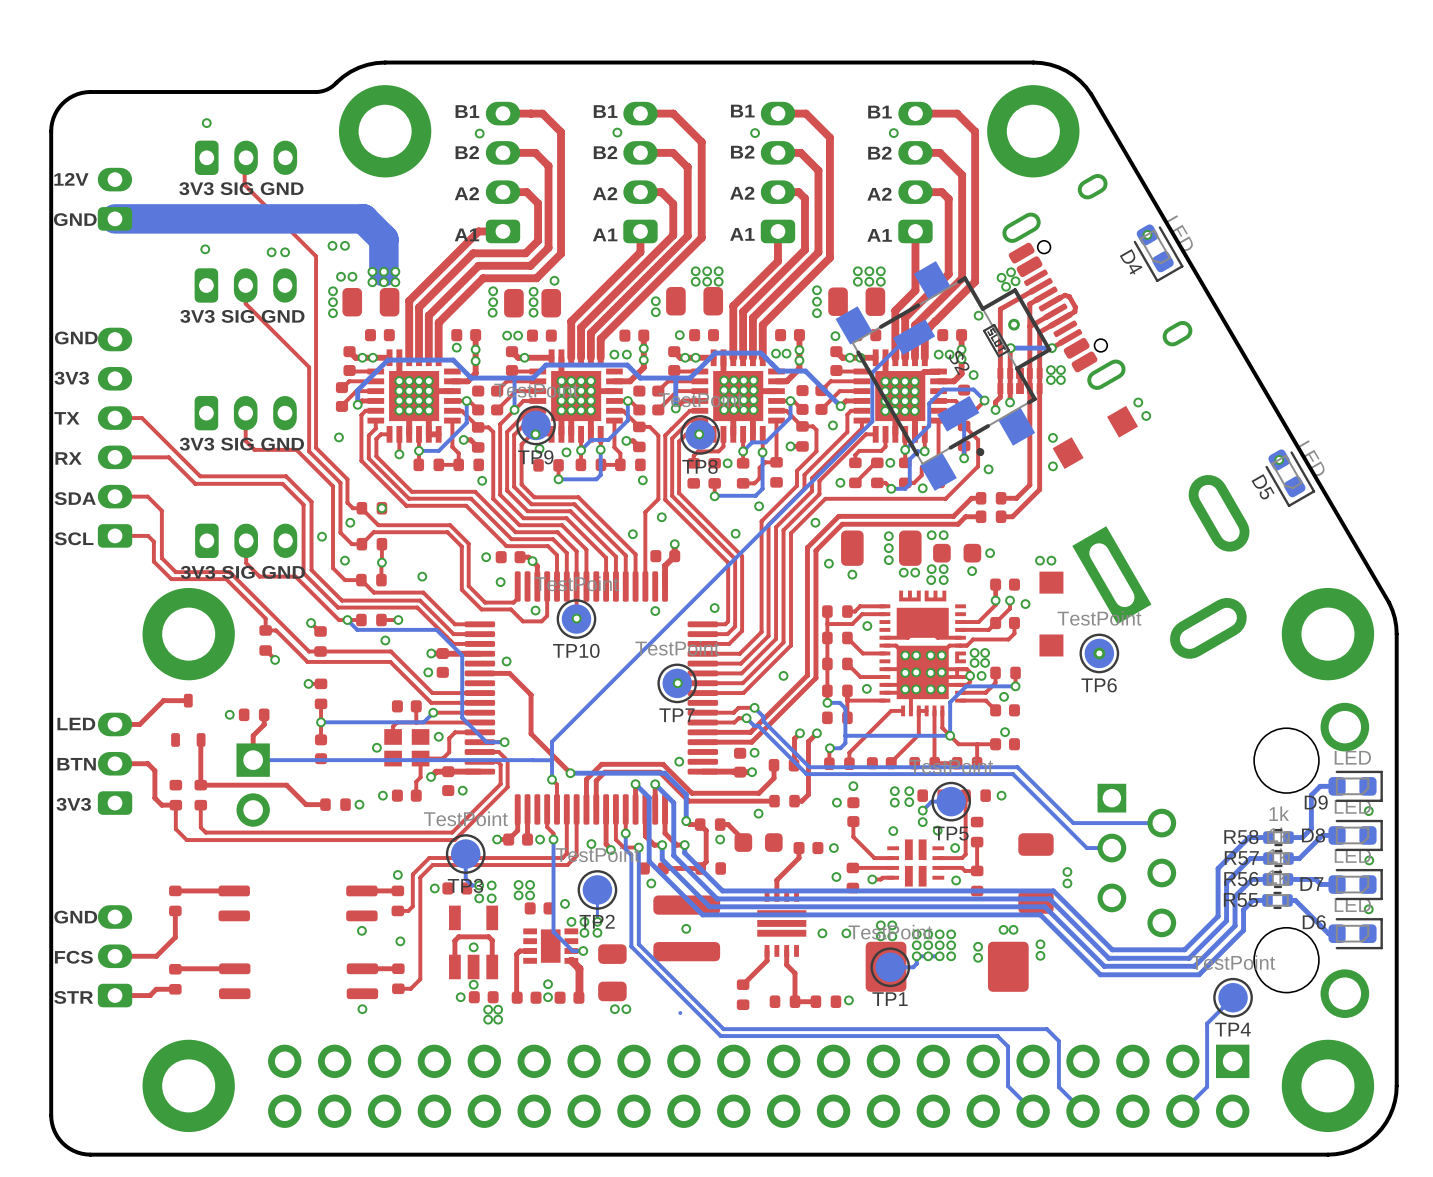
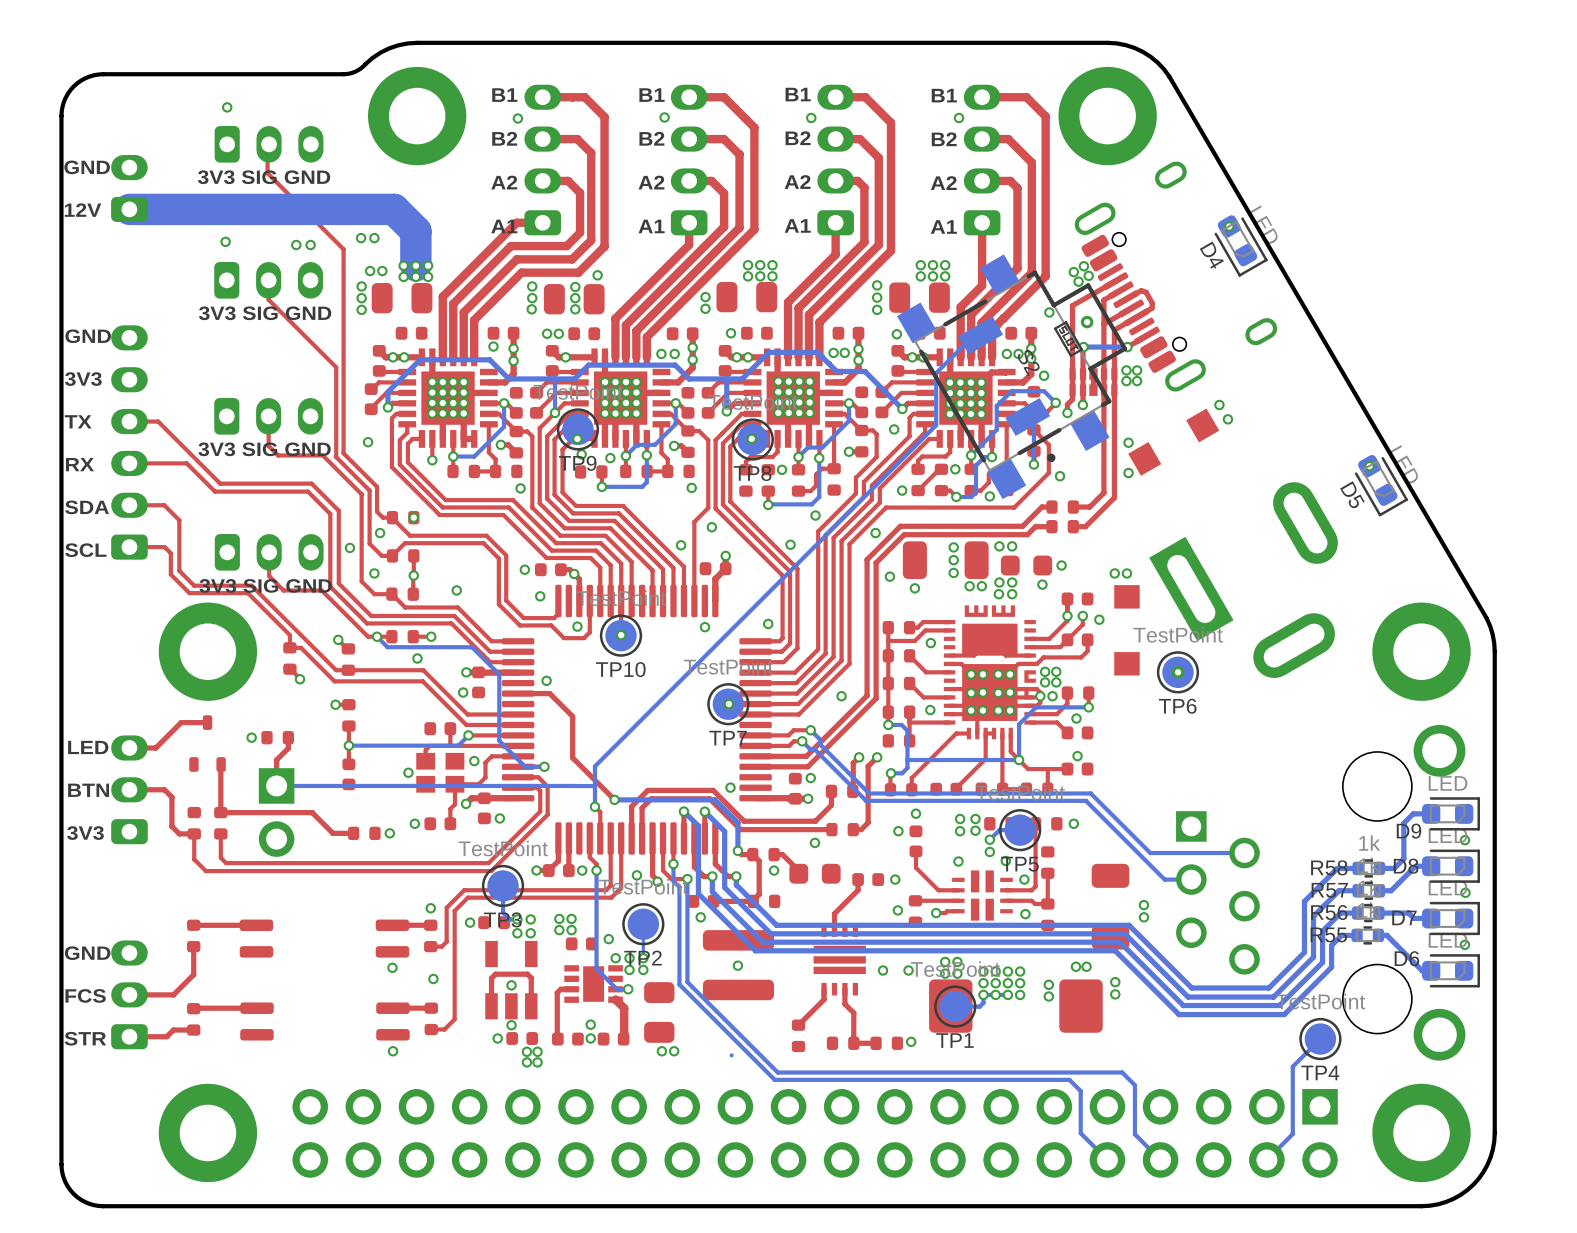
text: 12V (71, 179) -> GND (87, 167)
text: GND (75, 219) -> 12V (83, 210)

